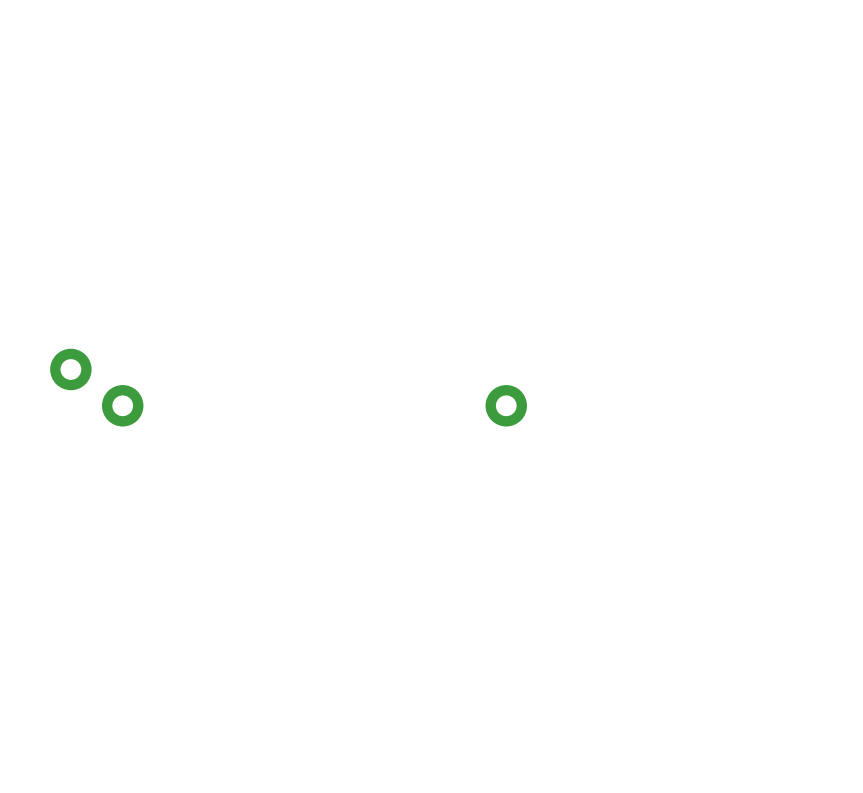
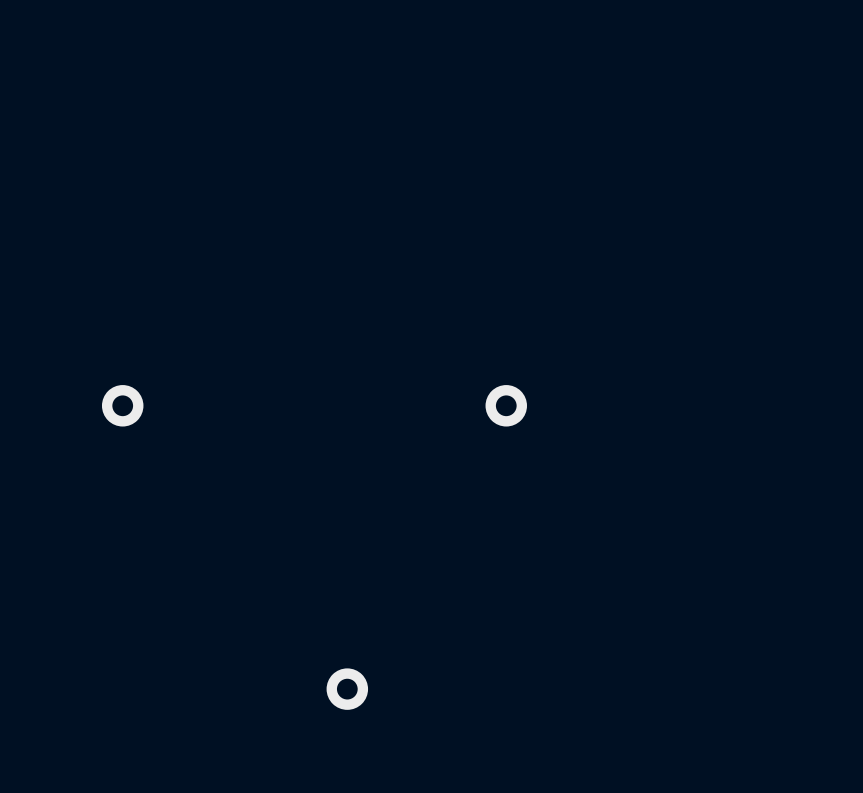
via: (70, 369) -> none
via: none -> (347, 689)

